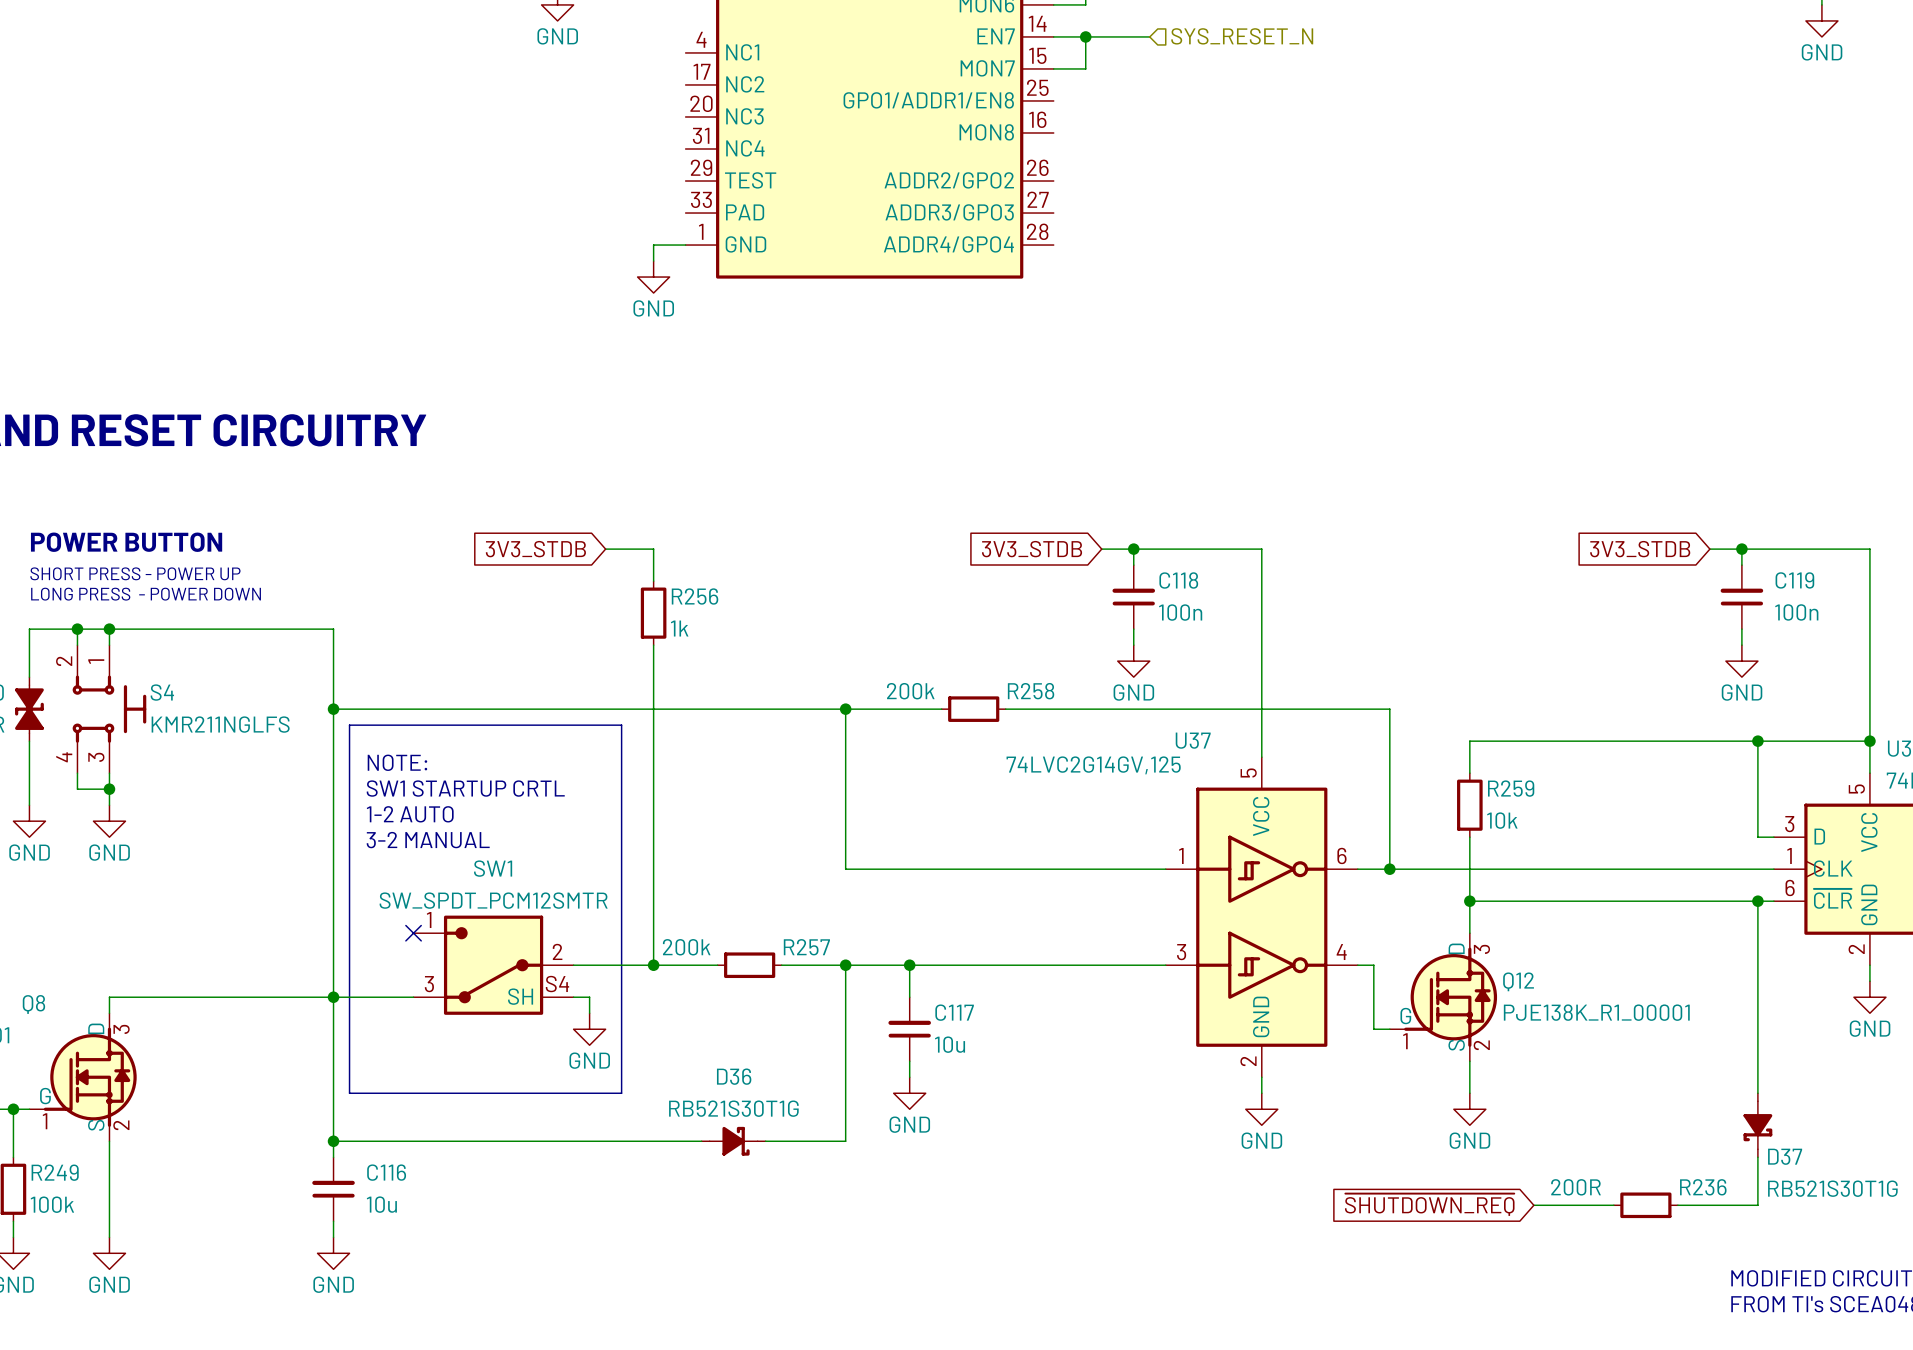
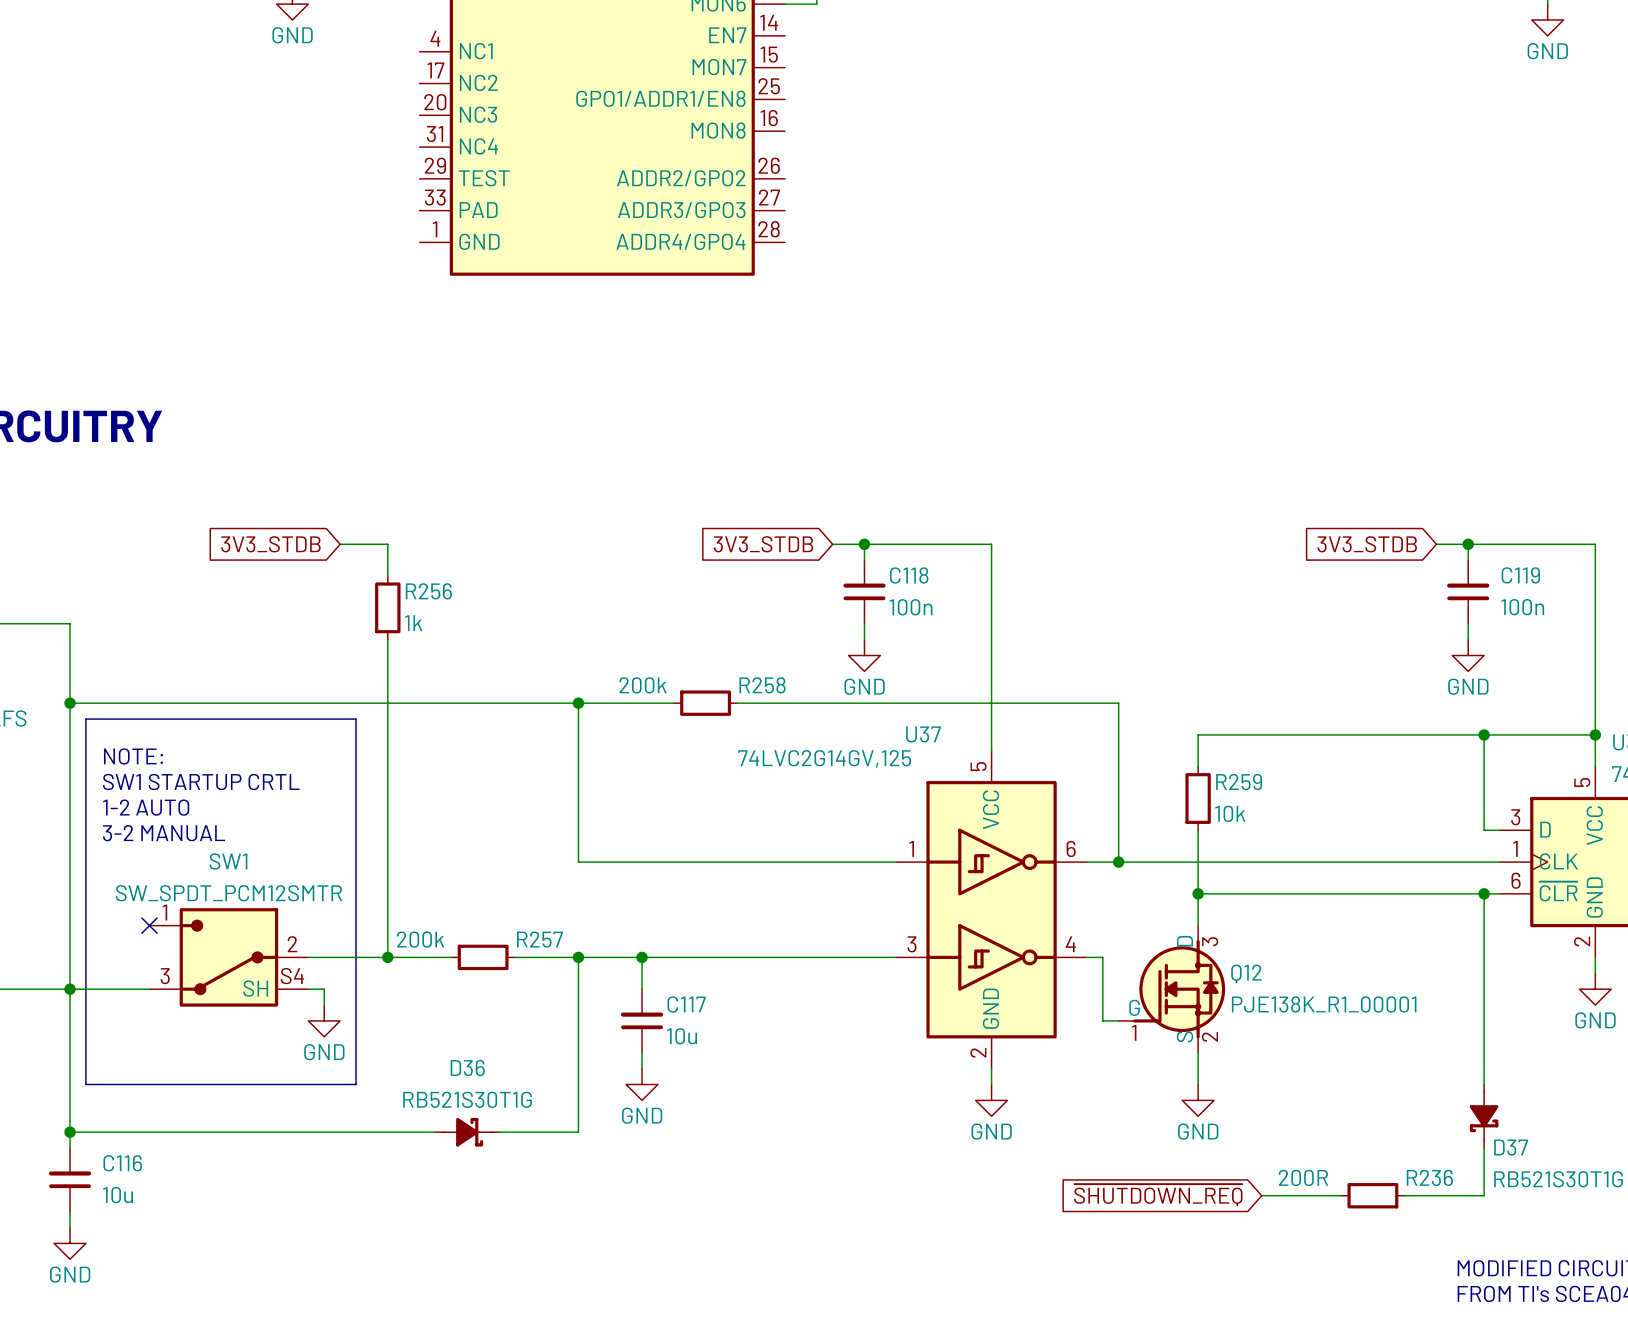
wire: (1053, 36) (1149, 36) -> none
wire: (1085, 36) (1085, 68) (1053, 68) -> none
junction: (1085, 36) -> none
hierarchical label: SYS_RESET_N (1242, 36) -> none
wire: (685, 245) (653, 245) (653, 261) -> none
power symbol: GND (653, 277) -> none

